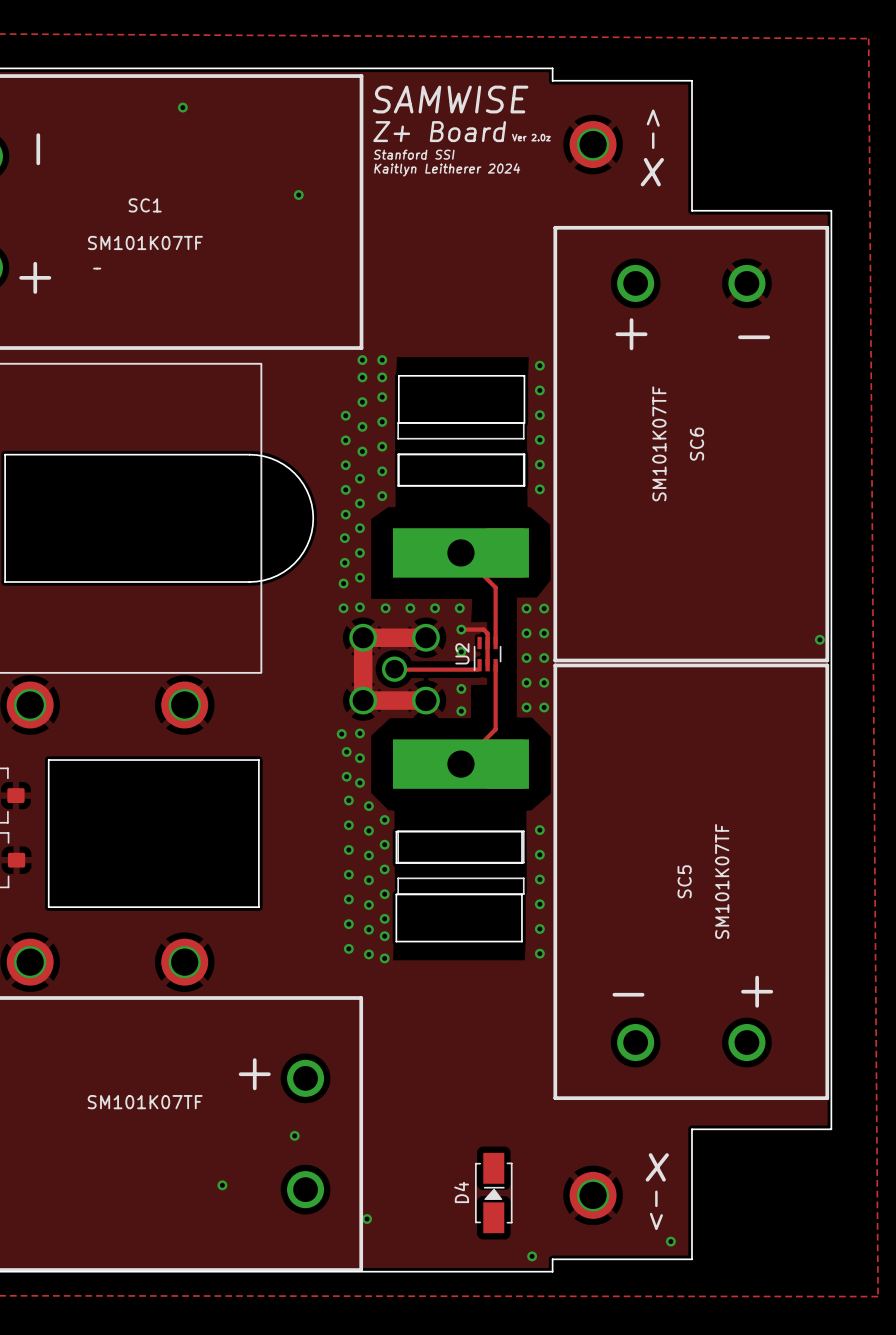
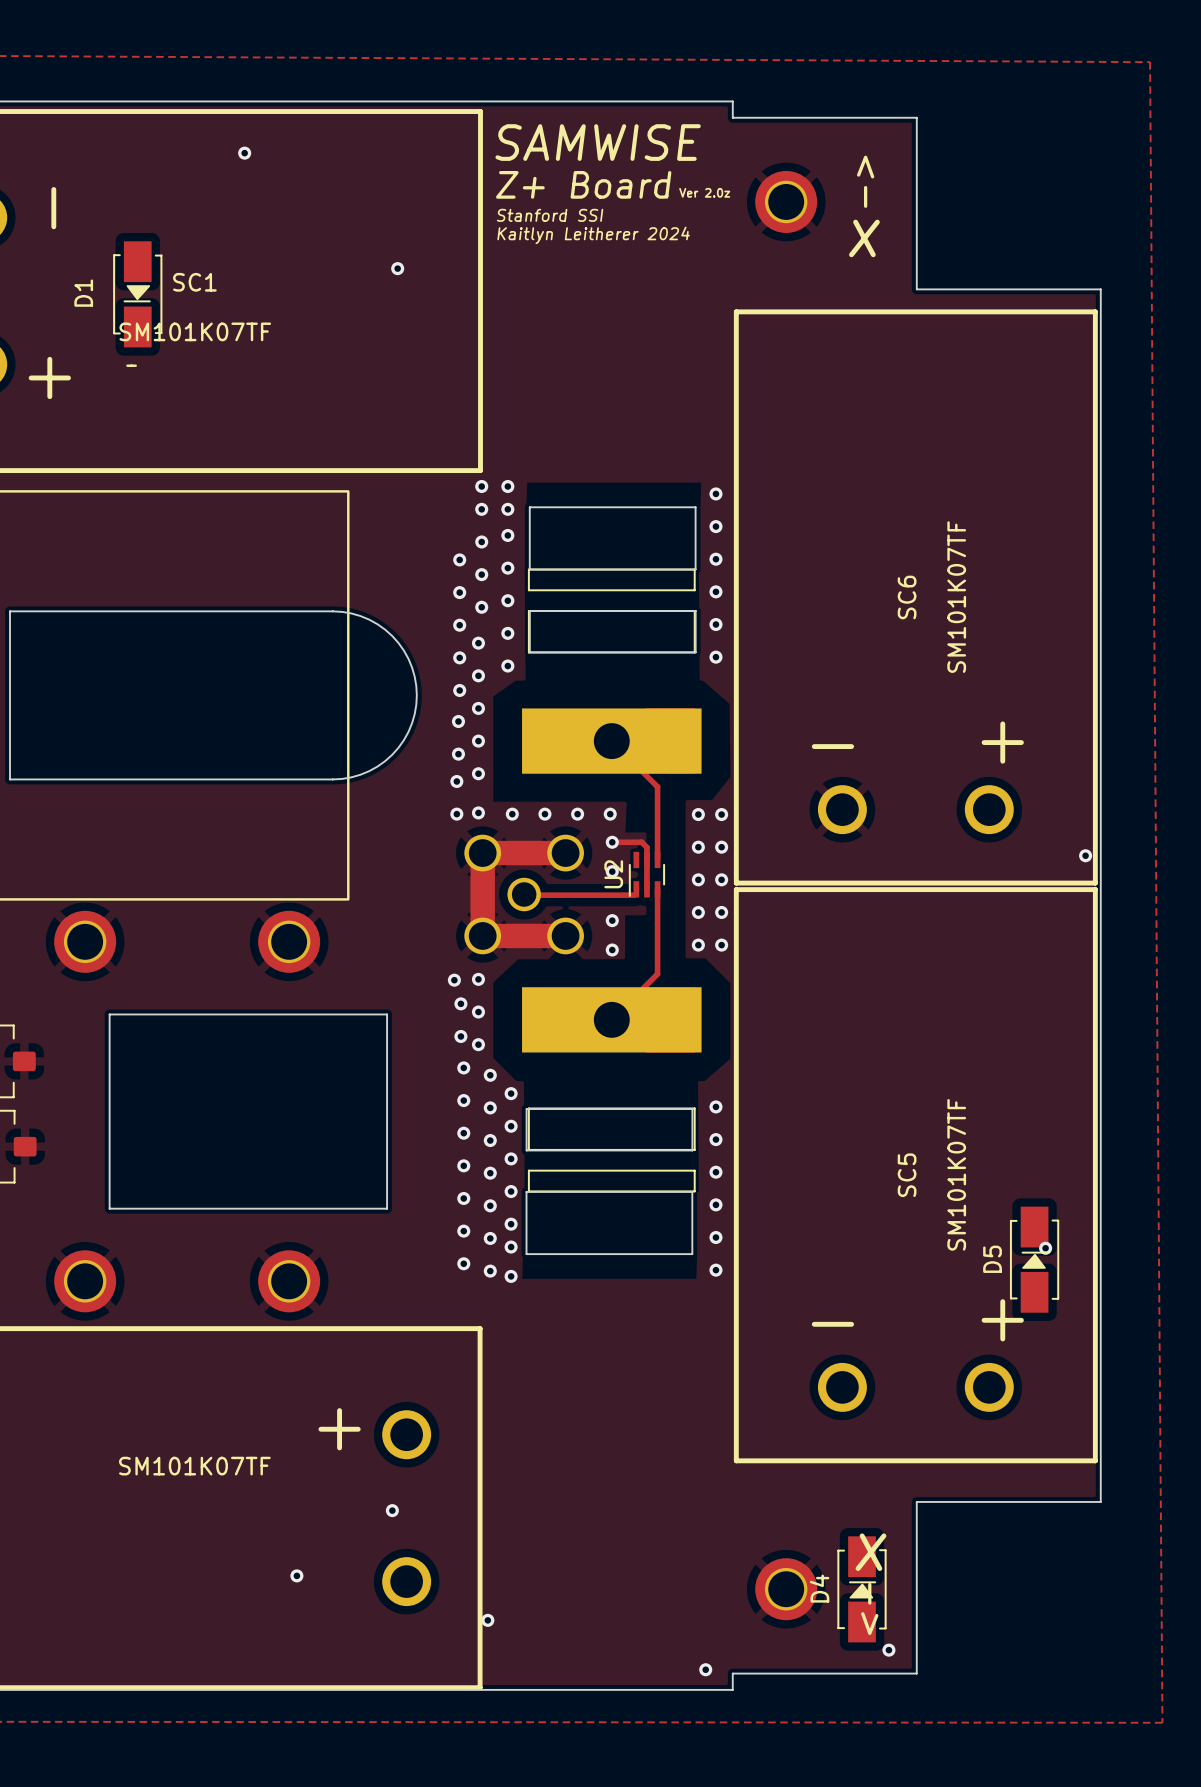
D1: none -> (137, 294)
SC6 rotation: 0° (691, 444) -> 180° (915, 597)
part position: (30, 705) -> (85, 941)
part position: (184, 705) -> (289, 941)
board edge: (80, 760) (48, 760) (48, 907) (80, 907) -> (109, 1014) (109, 1208)
board edge: (258, 760) (258, 907) -> (345, 1014) (387, 1014) (387, 1208) (345, 1208)
via: none -> (1045, 1248)
D5: none -> (1034, 1259)
part position: (30, 962) -> (85, 1281)
part position: (184, 962) -> (289, 1281)
D4 position: (493, 1193) -> (861, 1589)

